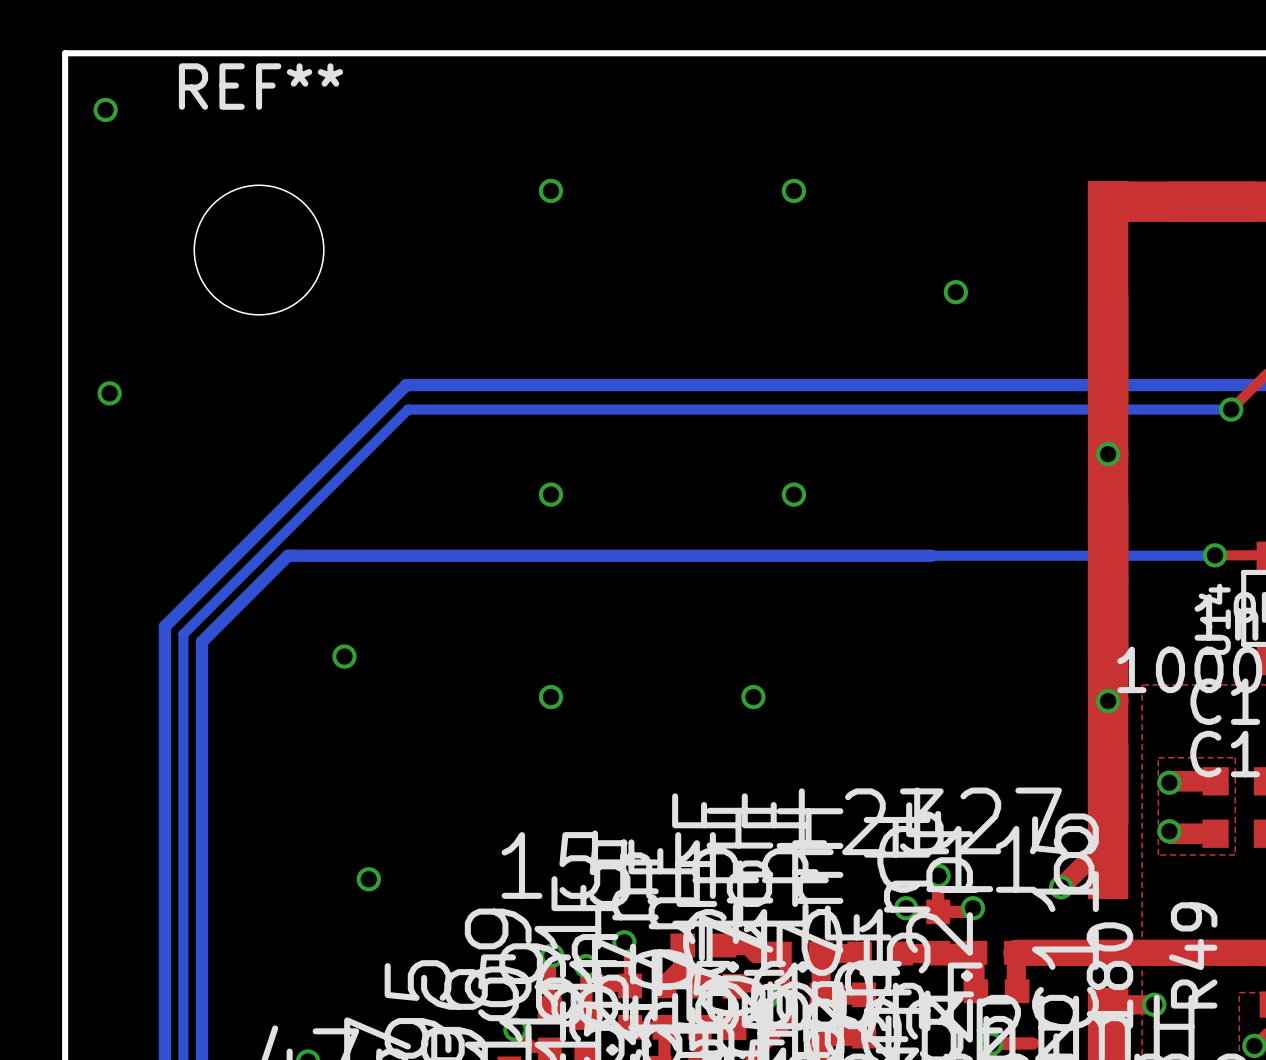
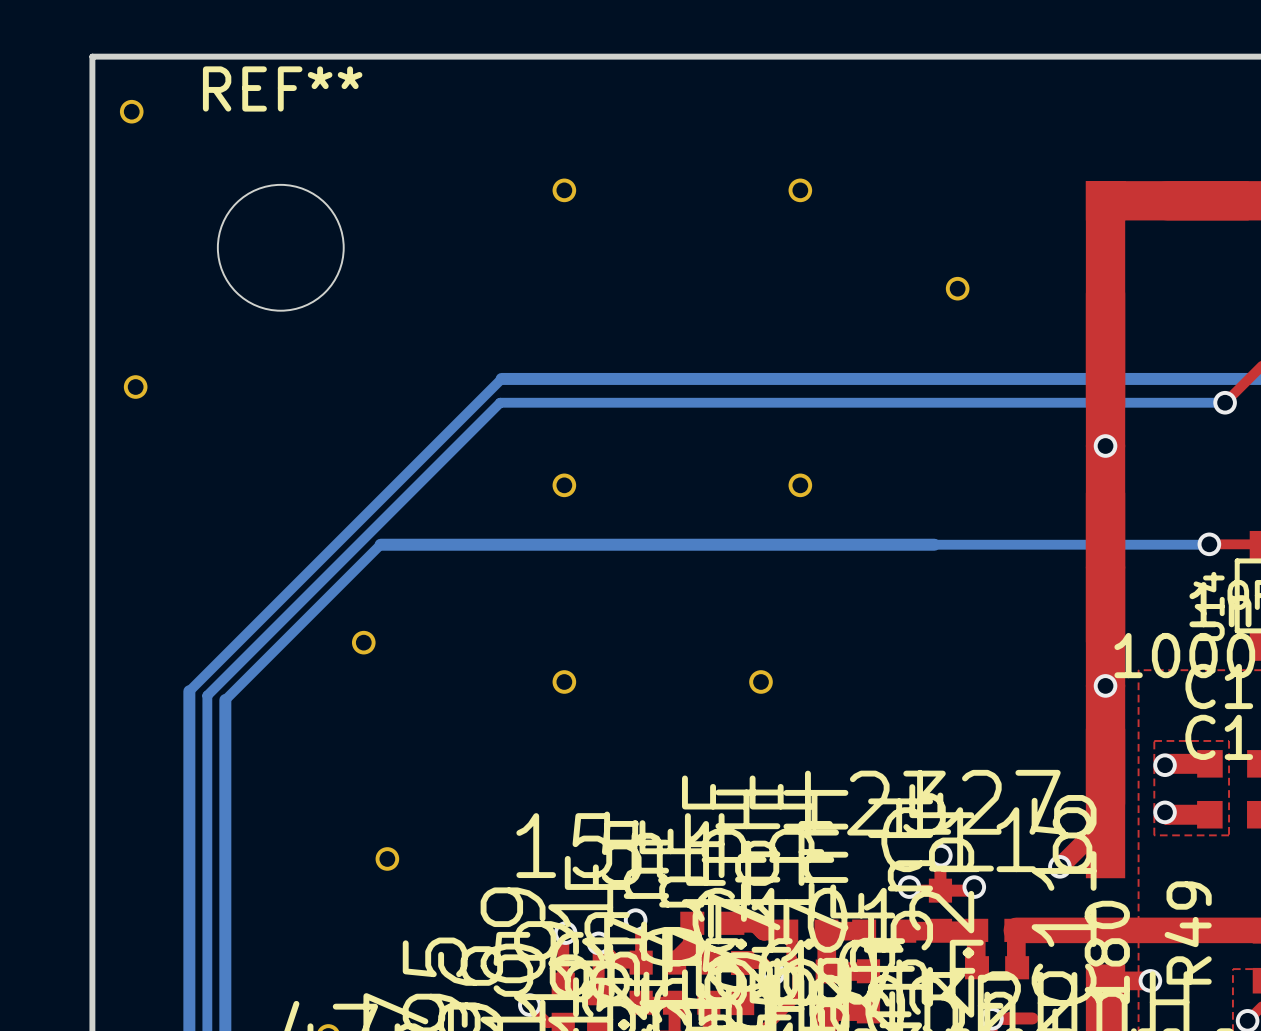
bottom track: (486, 385) (406, 385) (164, 626) (164, 706) -> (501, 378) (189, 691)
bottom track: (484, 409) (408, 409) (183, 634) (183, 711) -> (500, 402) (207, 695)
bottom track: (361, 555) (288, 555) (201, 641) (201, 715) -> (380, 544) (225, 699)

